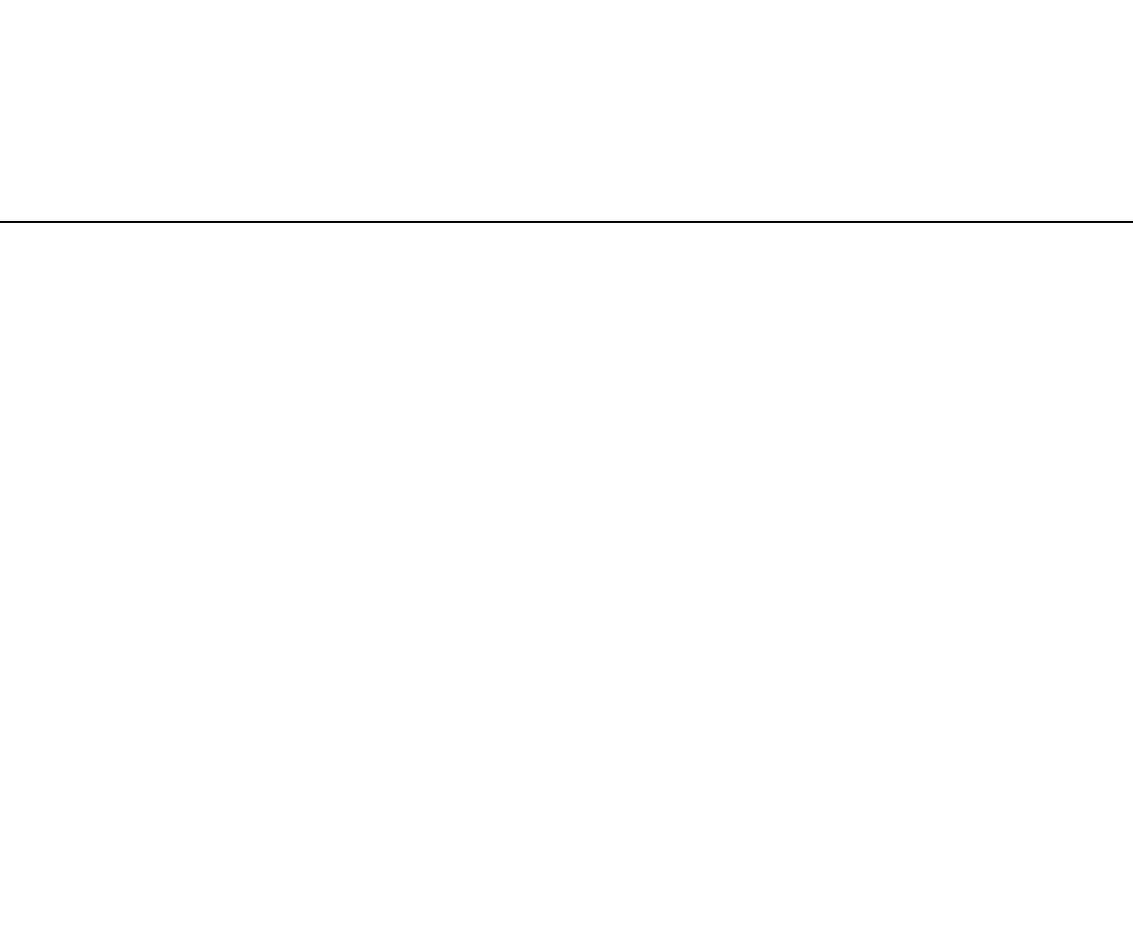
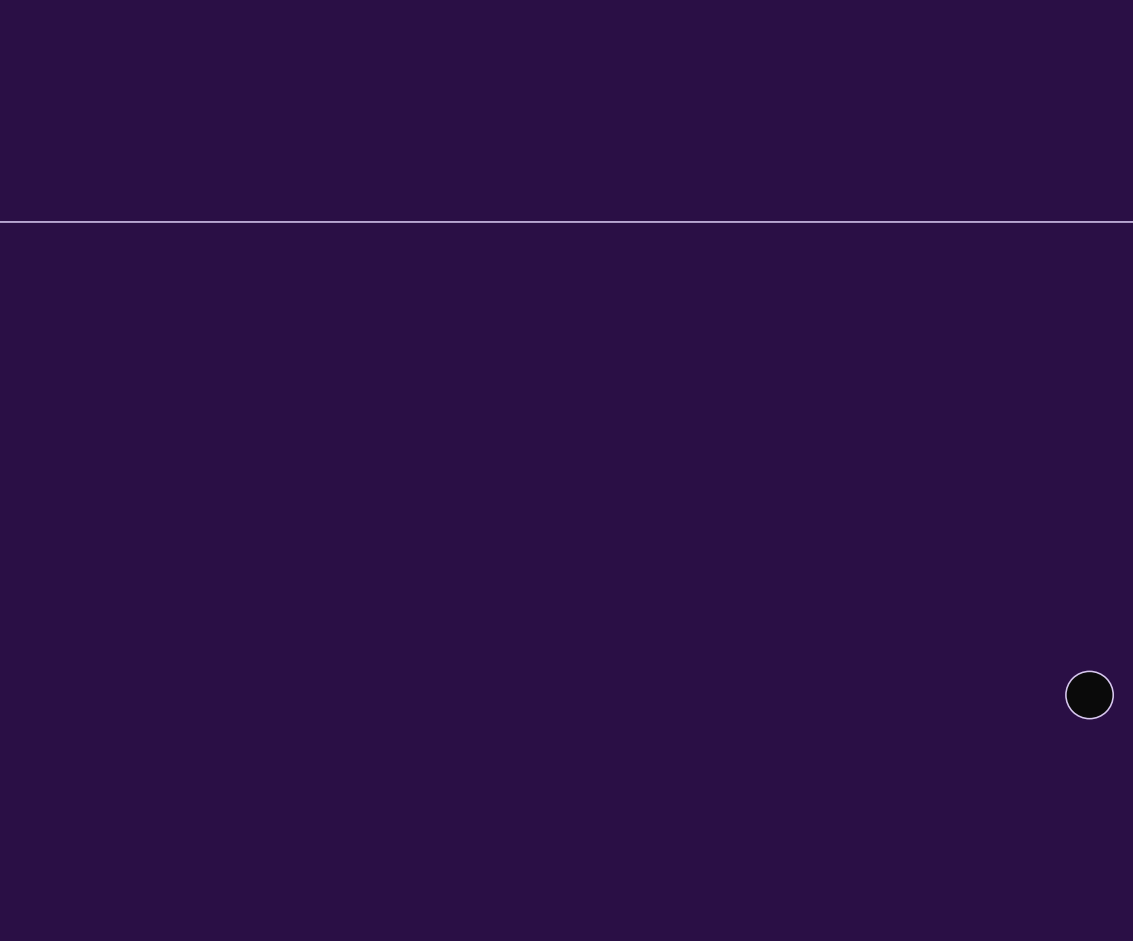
hole: none -> (1089, 695)

